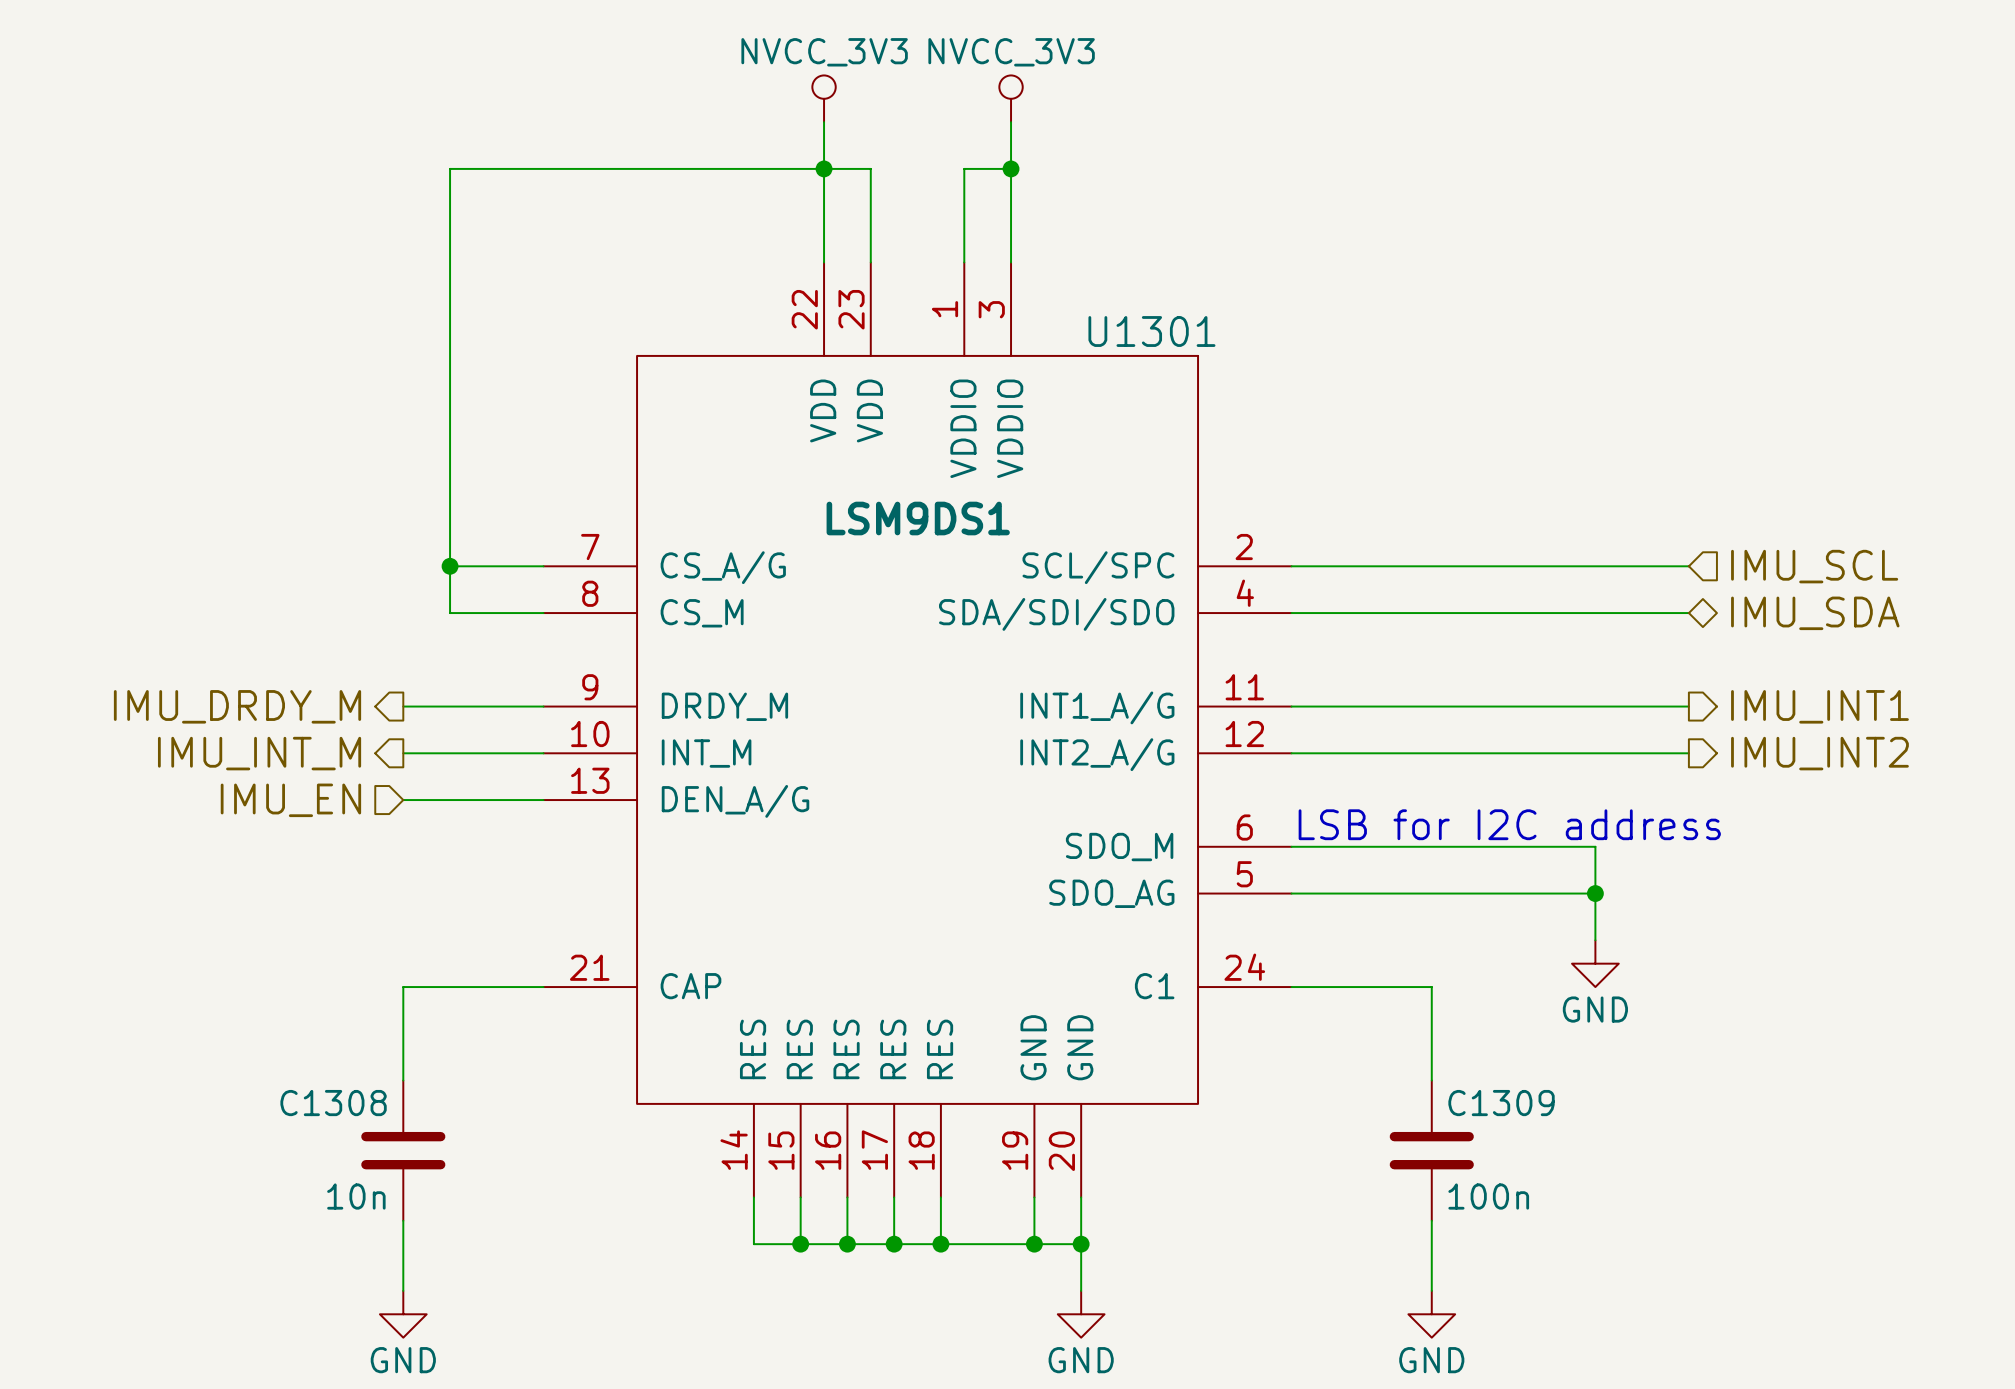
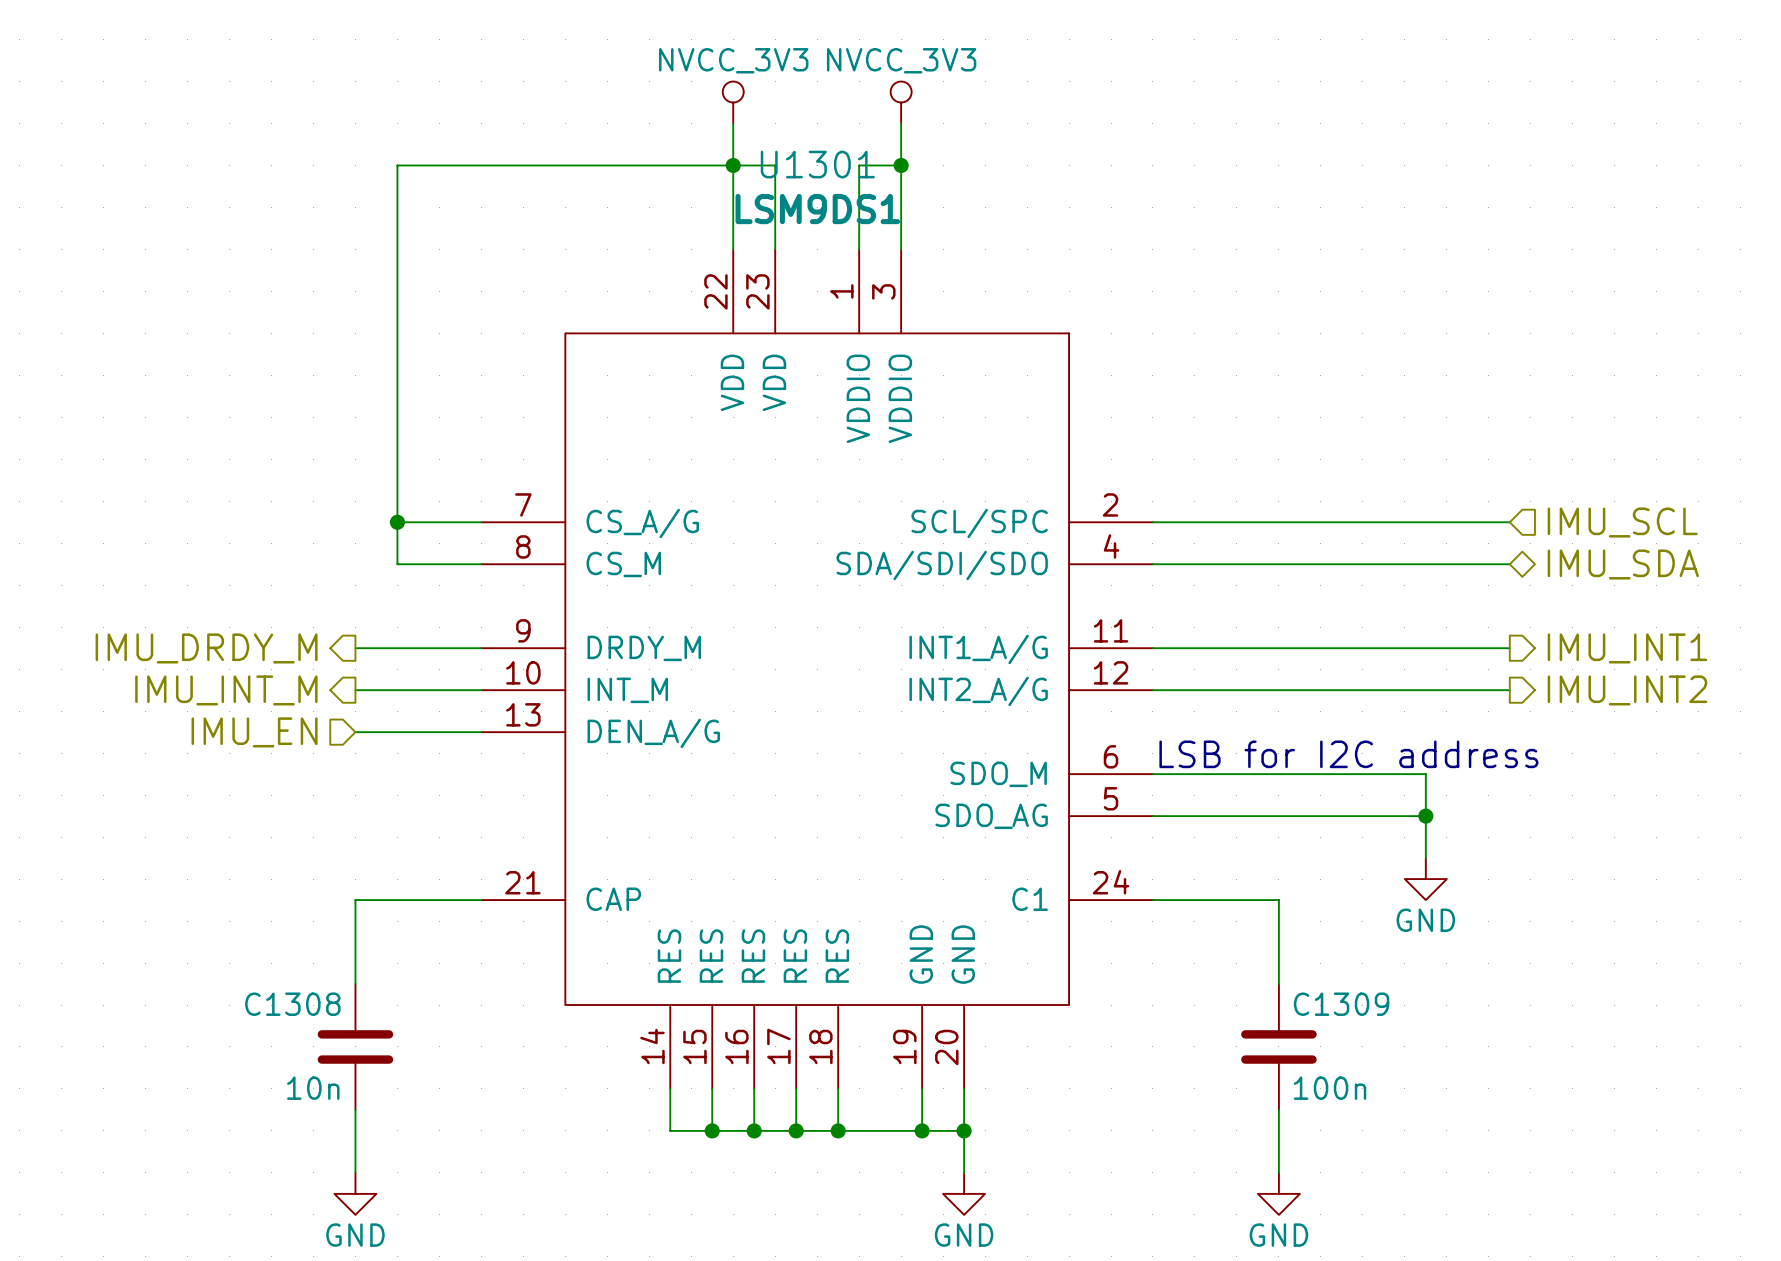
U1301 name position: U1301 (1151, 331) -> U1301 (817, 164)
U1301 value position: LSM9DS1 (918, 518) -> LSM9DS1 (817, 209)

